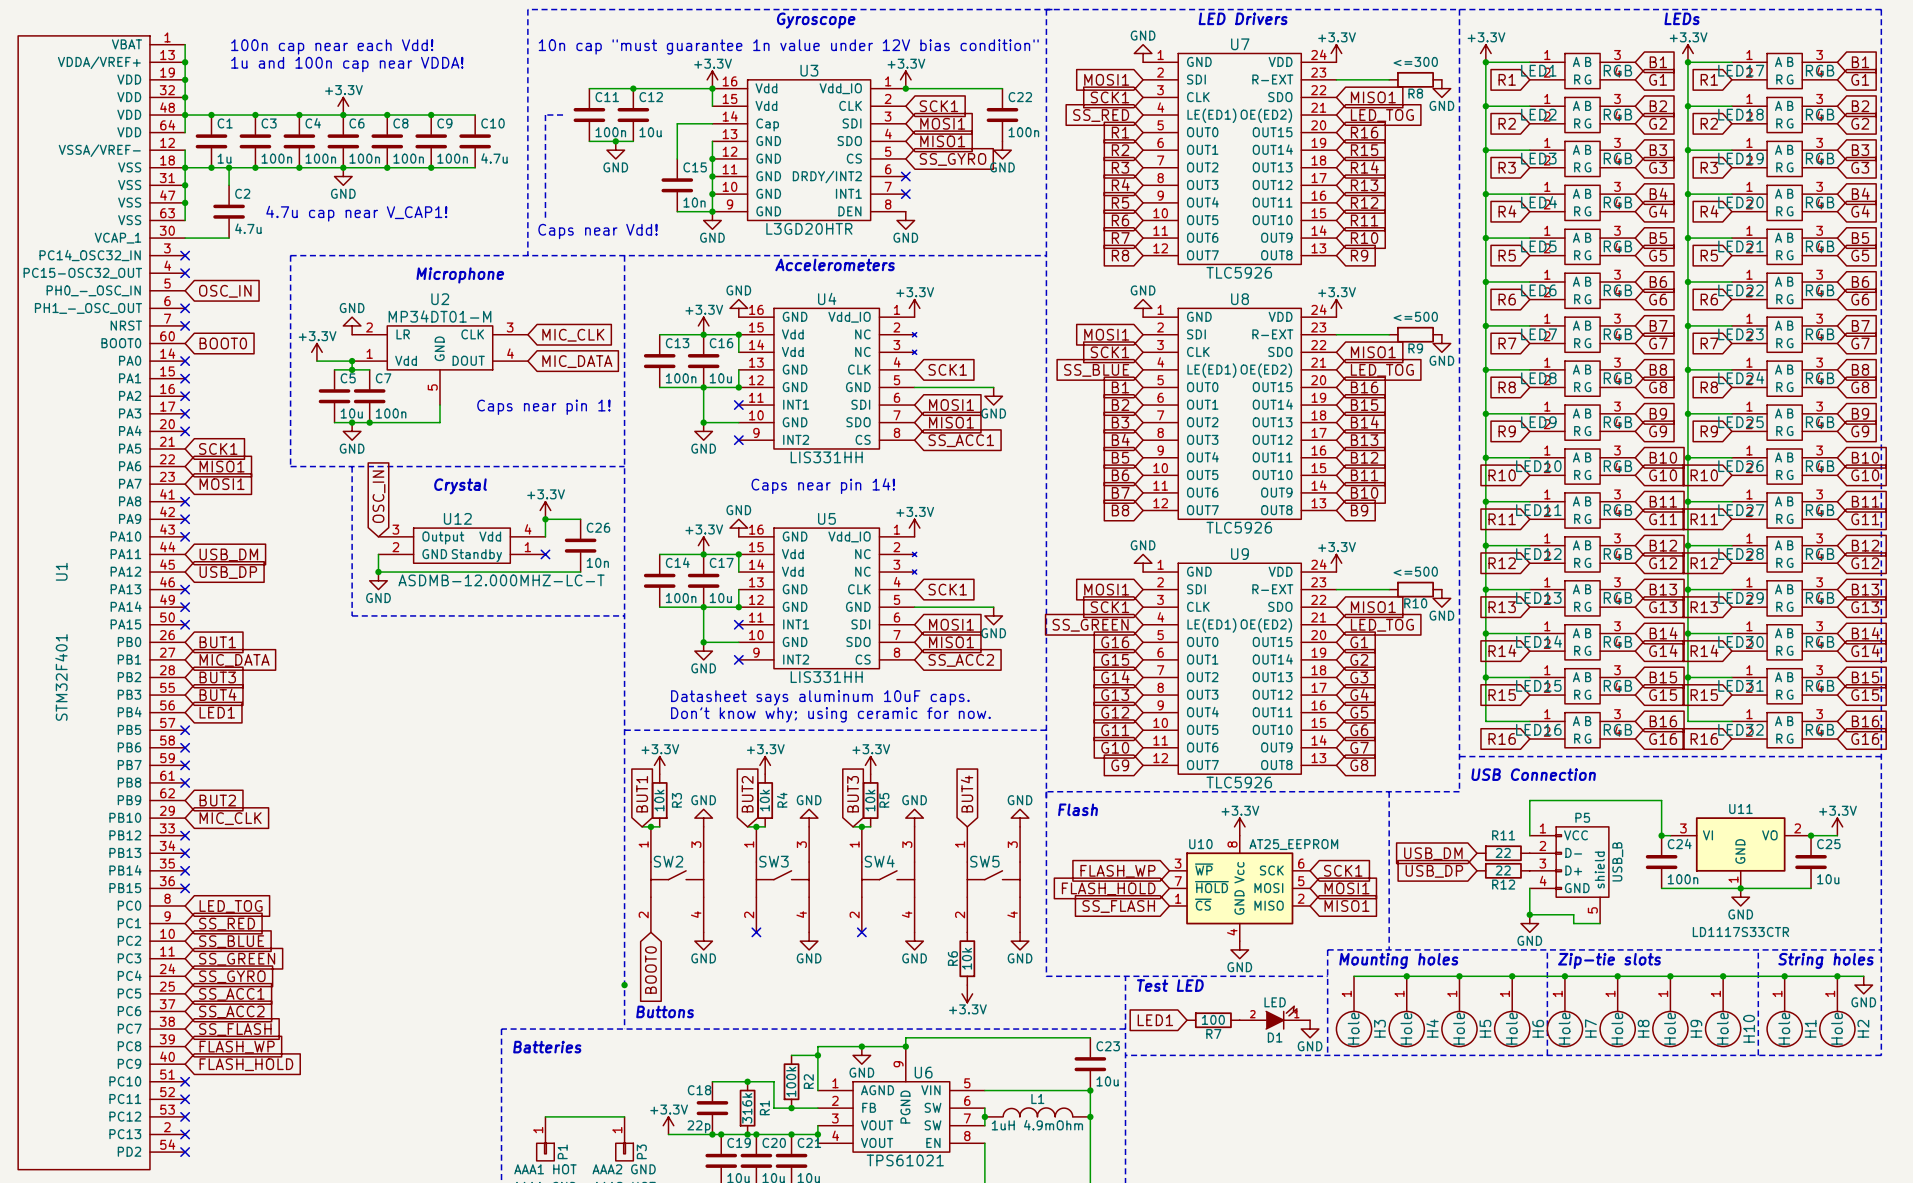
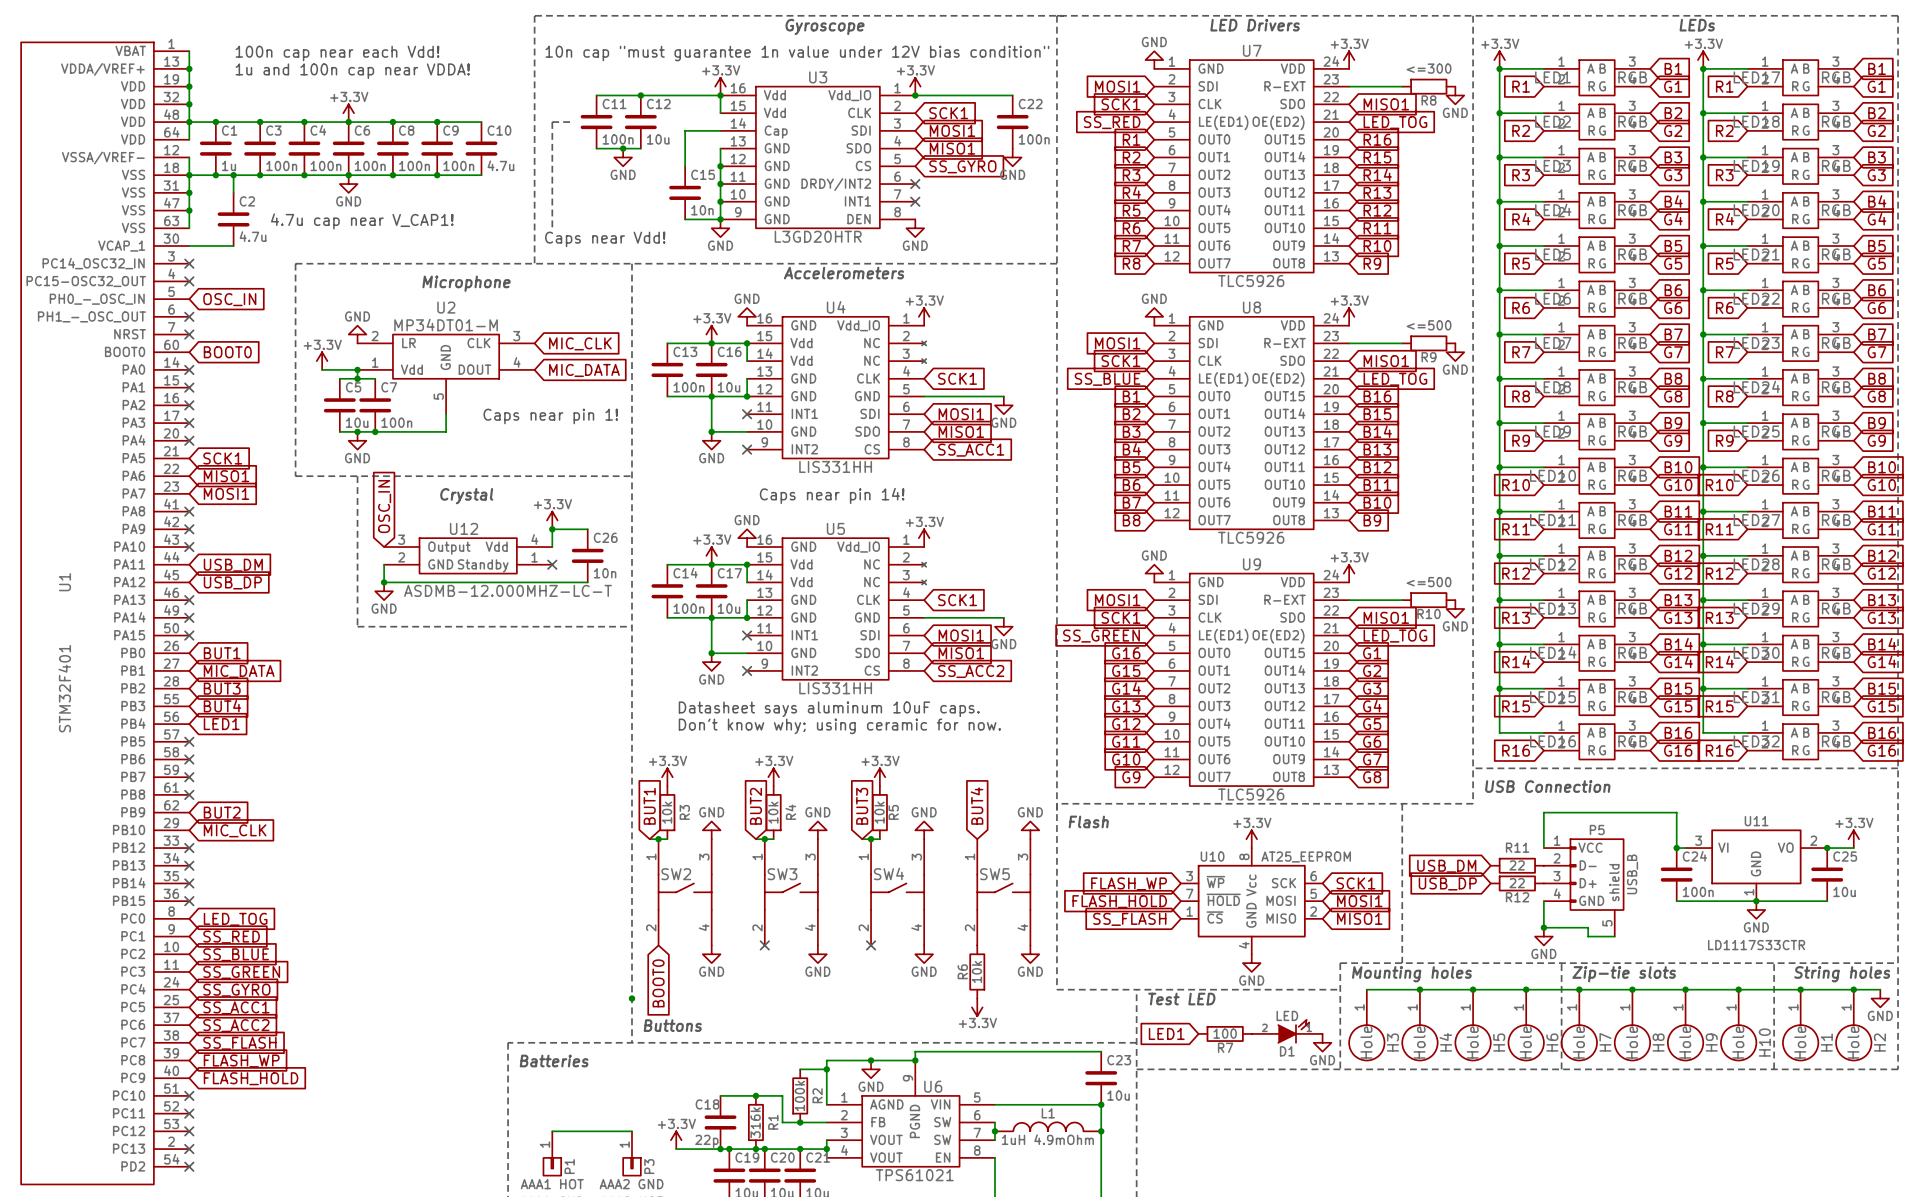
line: (624, 730) (1046, 730) -> none

